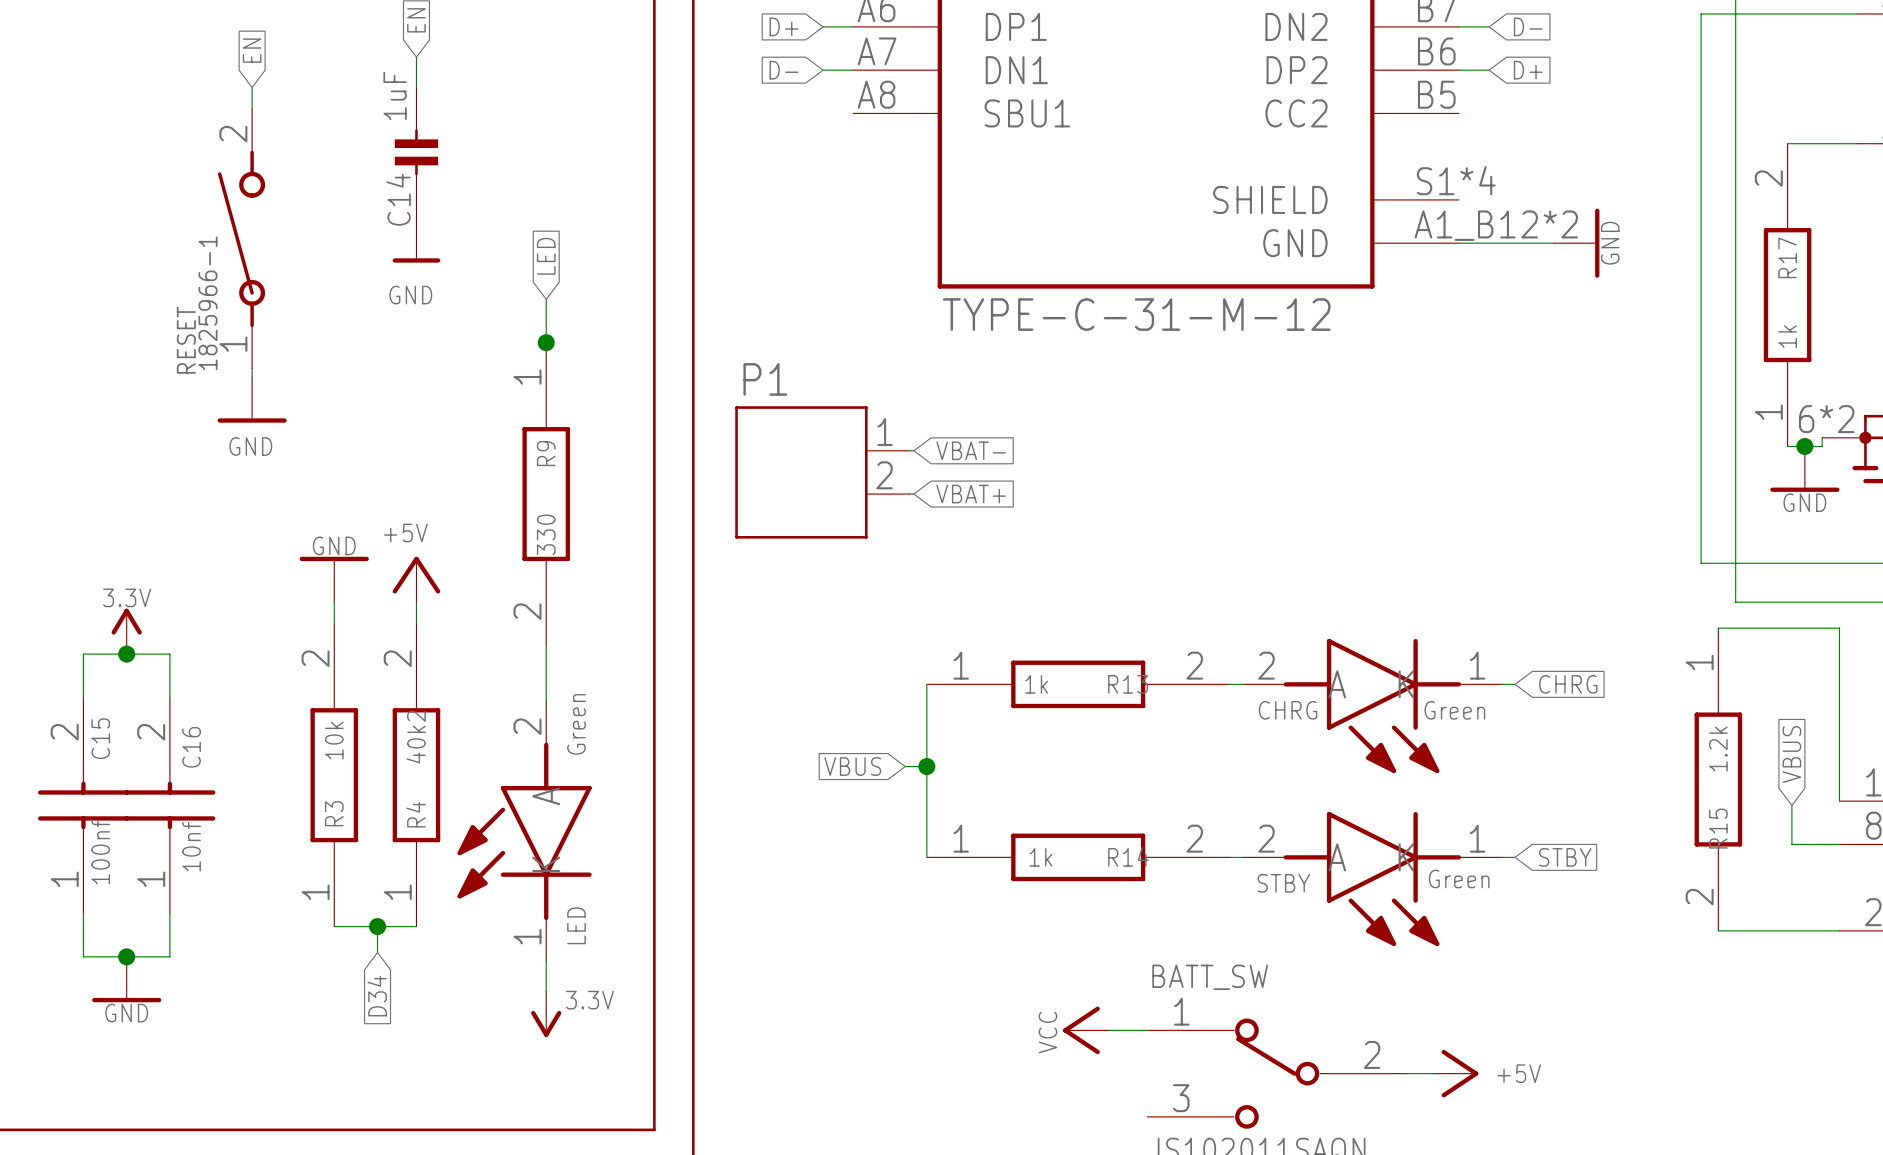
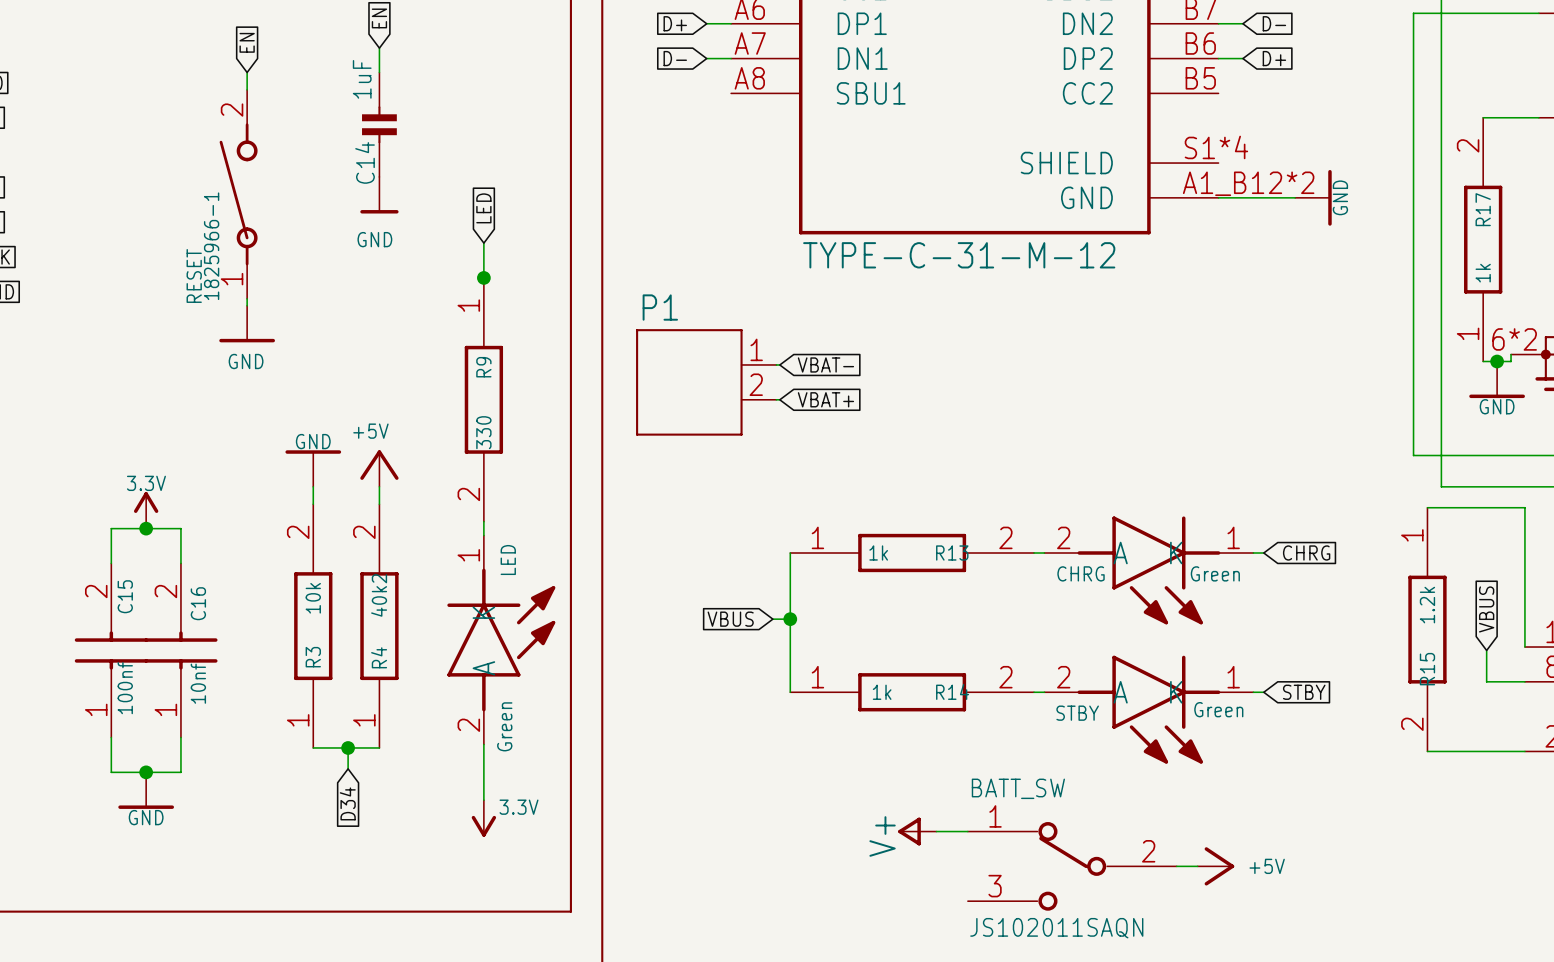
LED value position: Green (576, 724) -> Green (504, 726)
LED rotation: 0° (524, 831) -> 180° (501, 640)
LED name position: LED (576, 925) -> LED (508, 560)
power symbol: VCC (1085, 1030) -> V+ (917, 831)

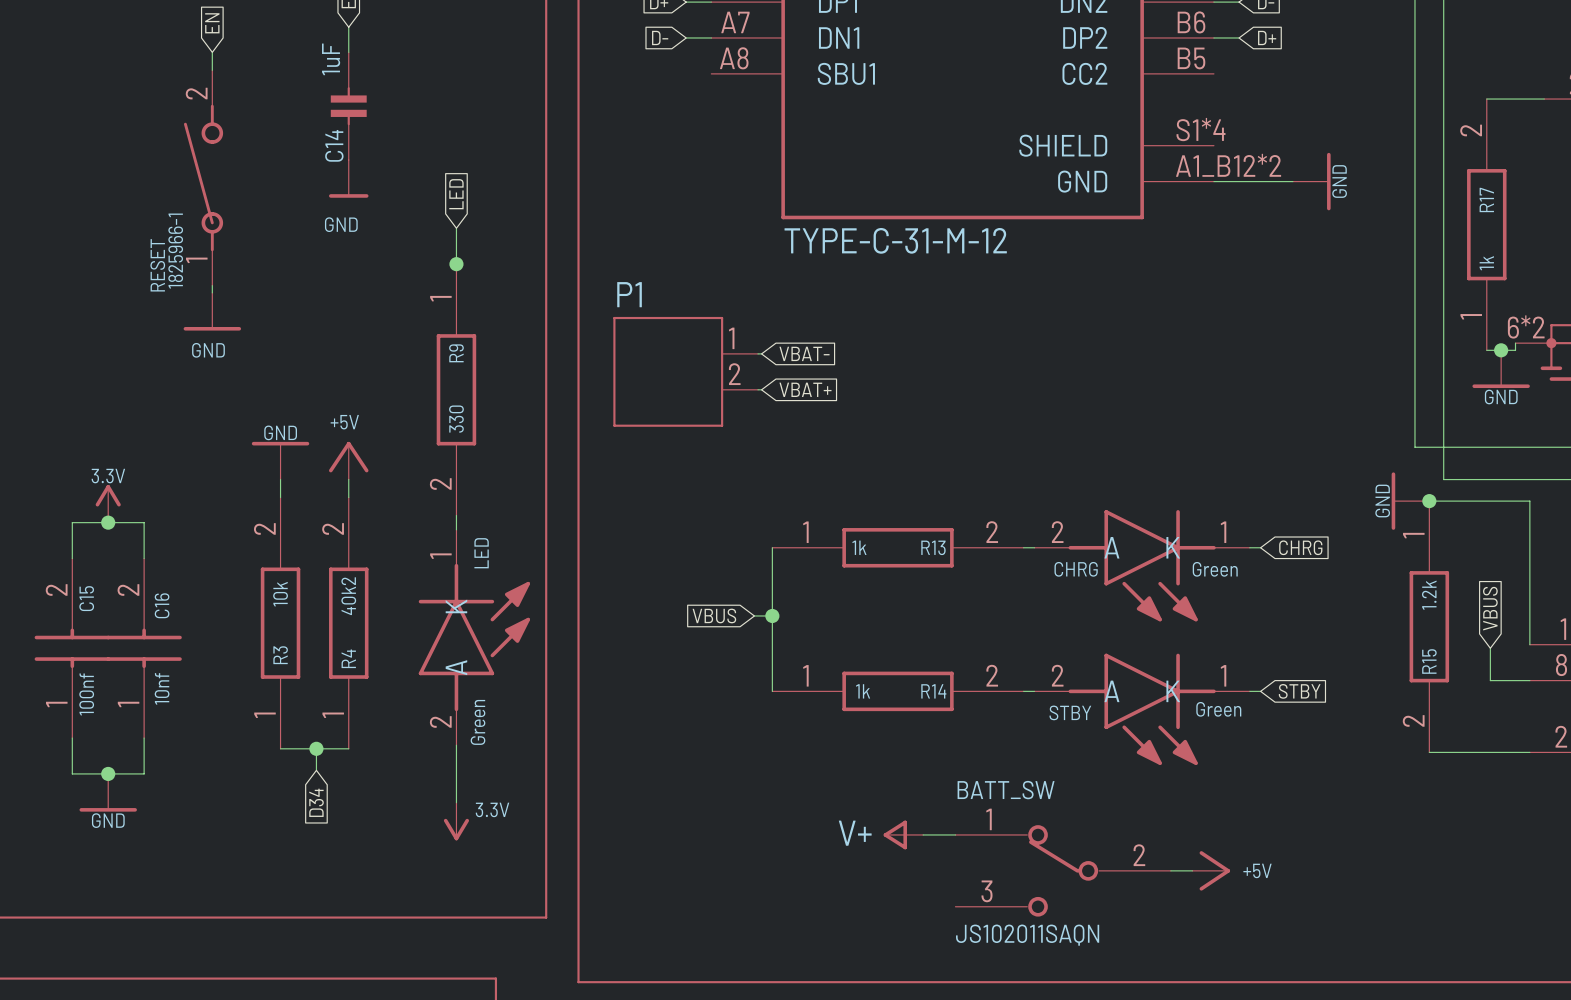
power symbol: none -> GND (1410, 501)
junction: none -> (1429, 501)
power symbol text rotation: 0° (882, 836) -> 90° clockwise (855, 833)

